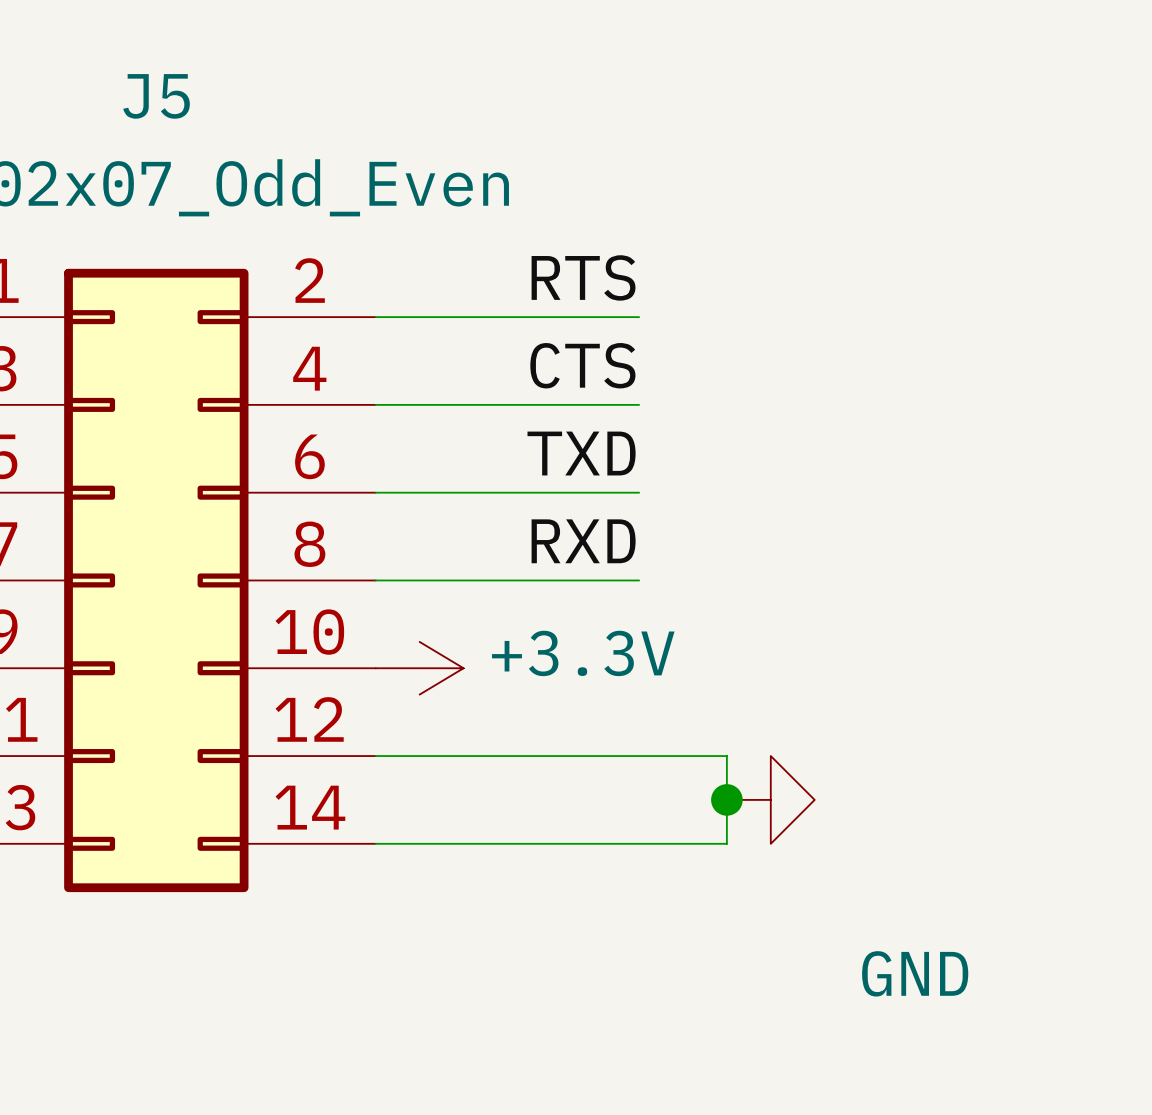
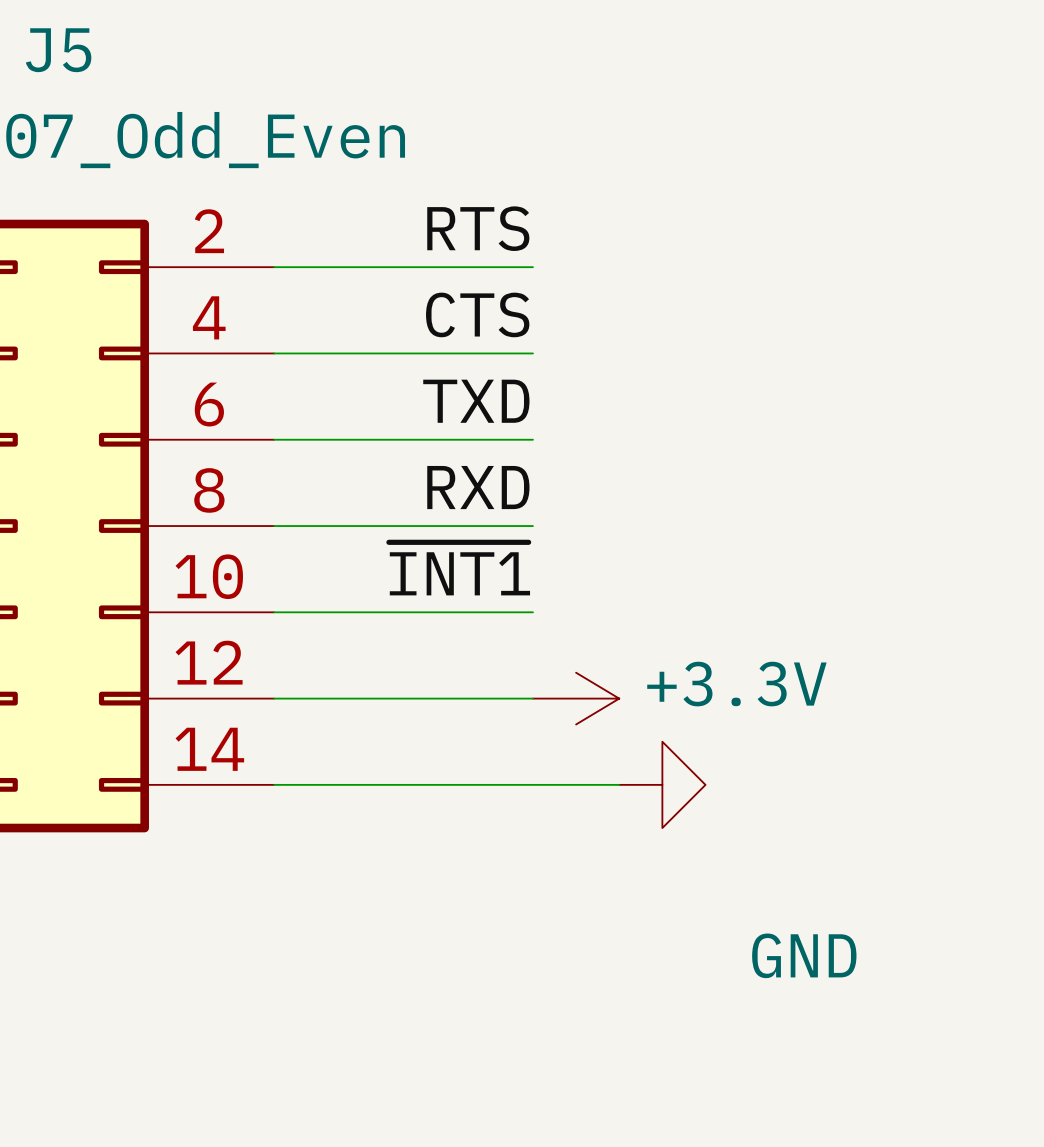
label: none -> ~{INT1} (459, 568)
wire: none -> (274, 612) (532, 612)
power symbol position: +3.3V (419, 668) -> +3.3V (576, 698)
wire: (639, 756) (726, 756) (726, 843) -> none
junction: (726, 799) -> none
power symbol position: GND (770, 799) -> GND (662, 784)

